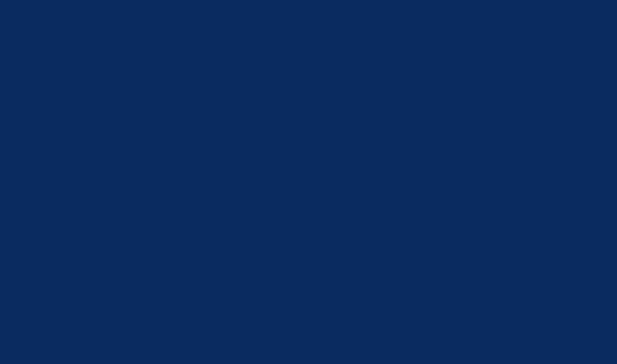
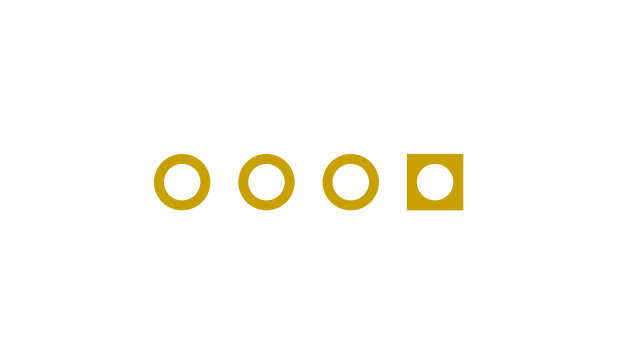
part: none -> (308, 182)

